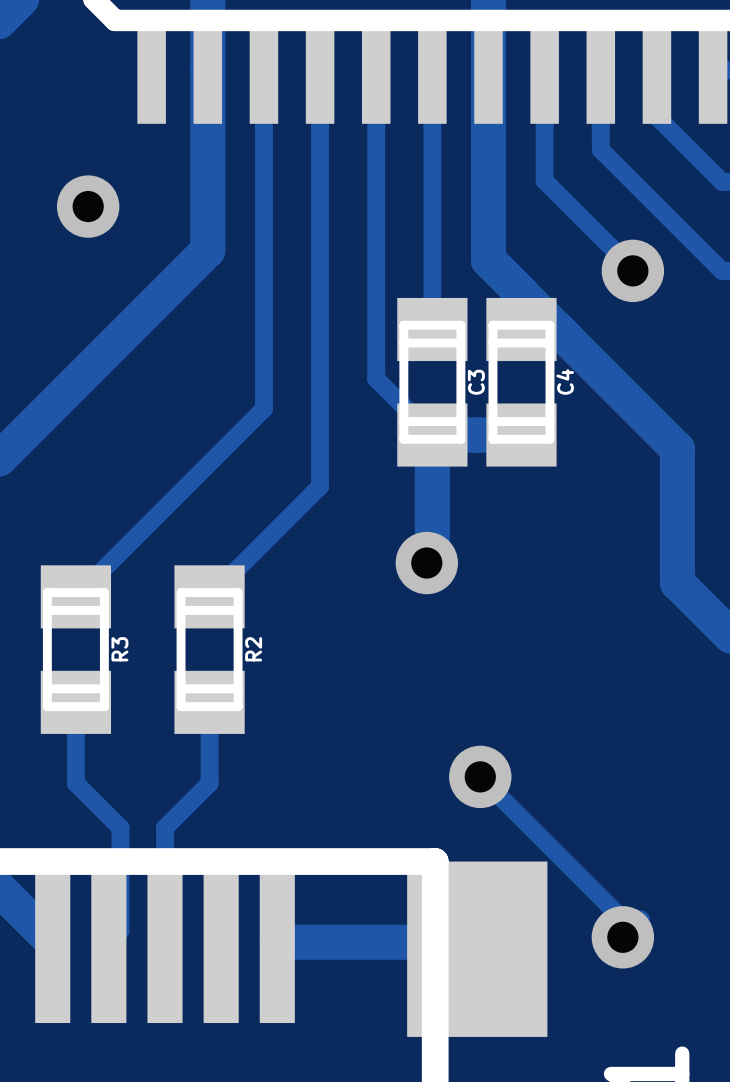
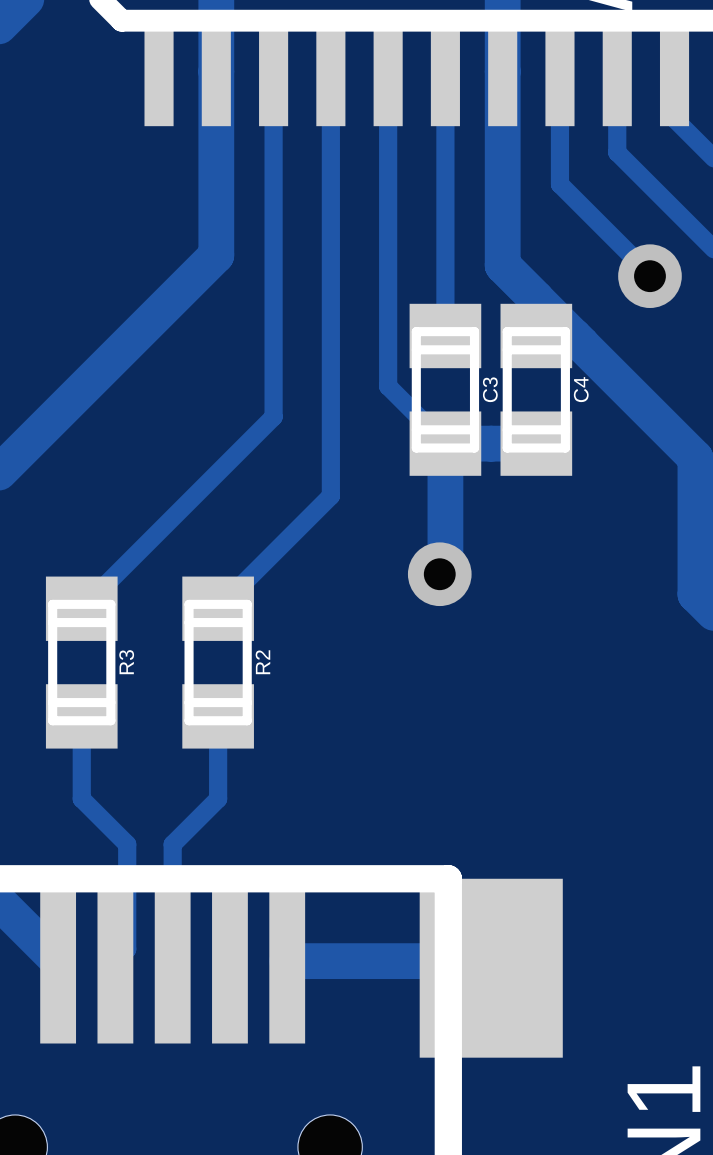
via: (88, 206) -> none
track: (480, 776) (622, 919) (640, 919) (622, 937) -> none
via: (480, 776) -> none
via: (622, 937) -> none

